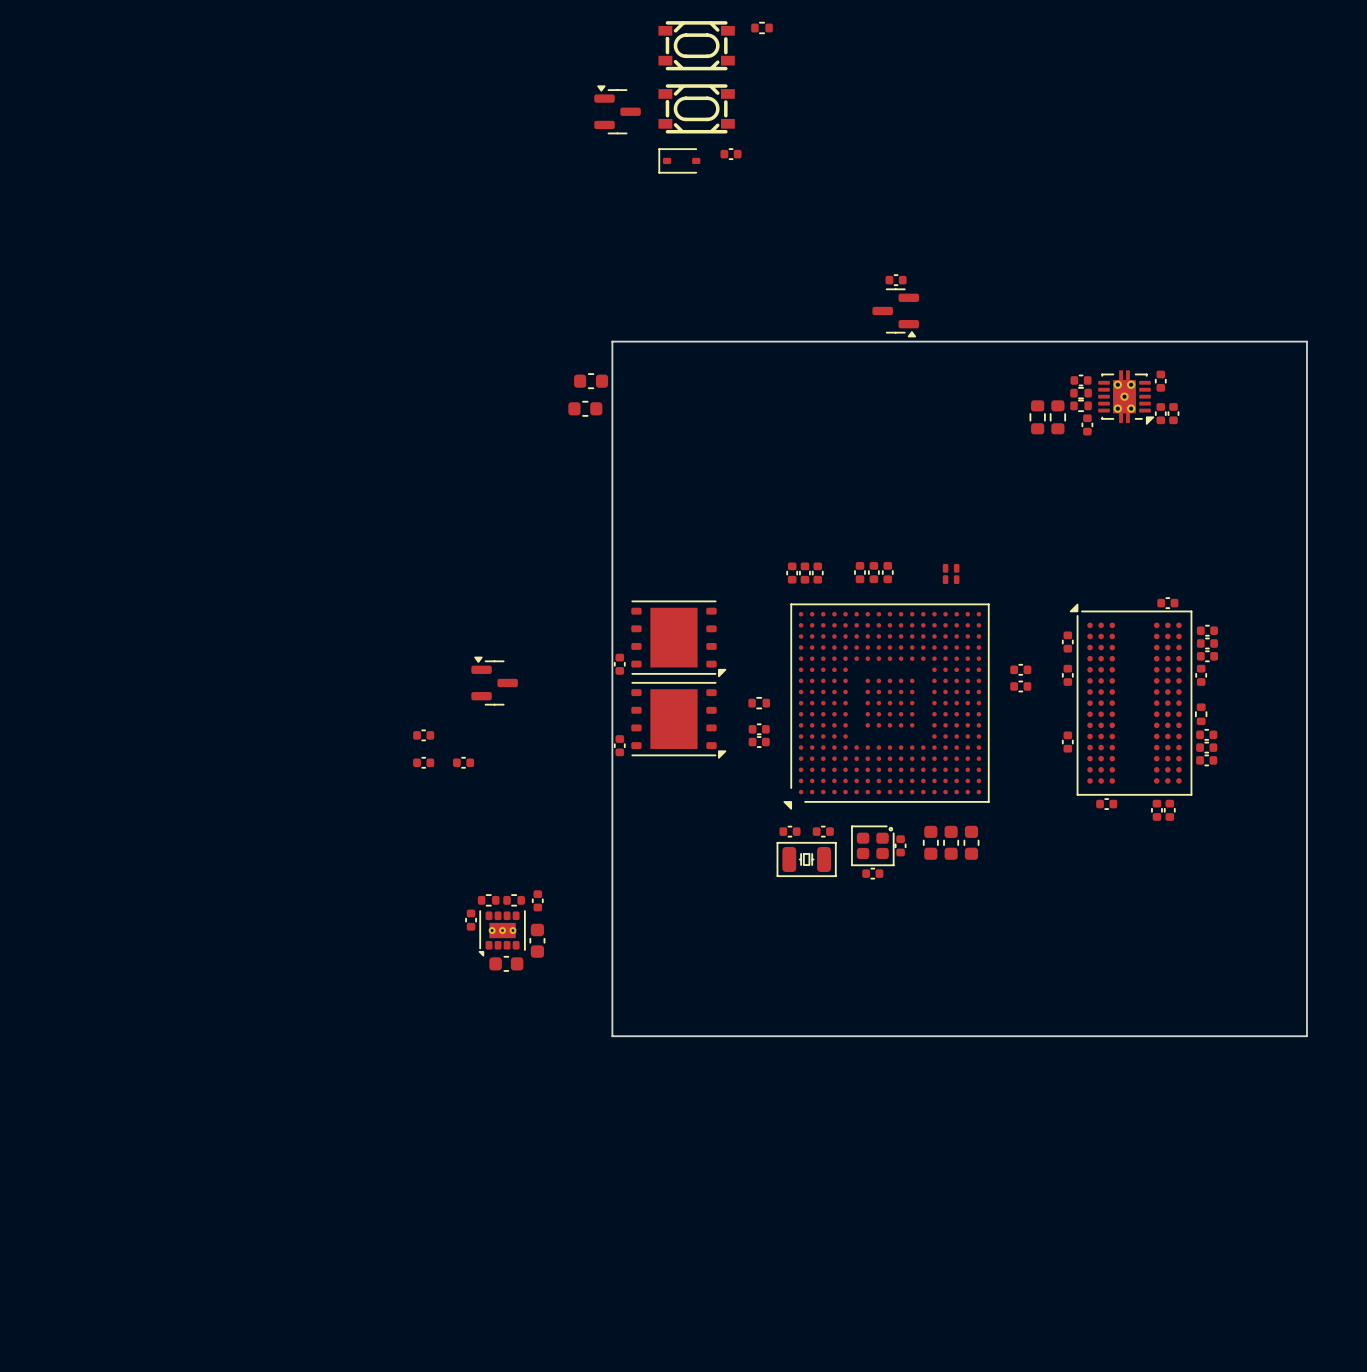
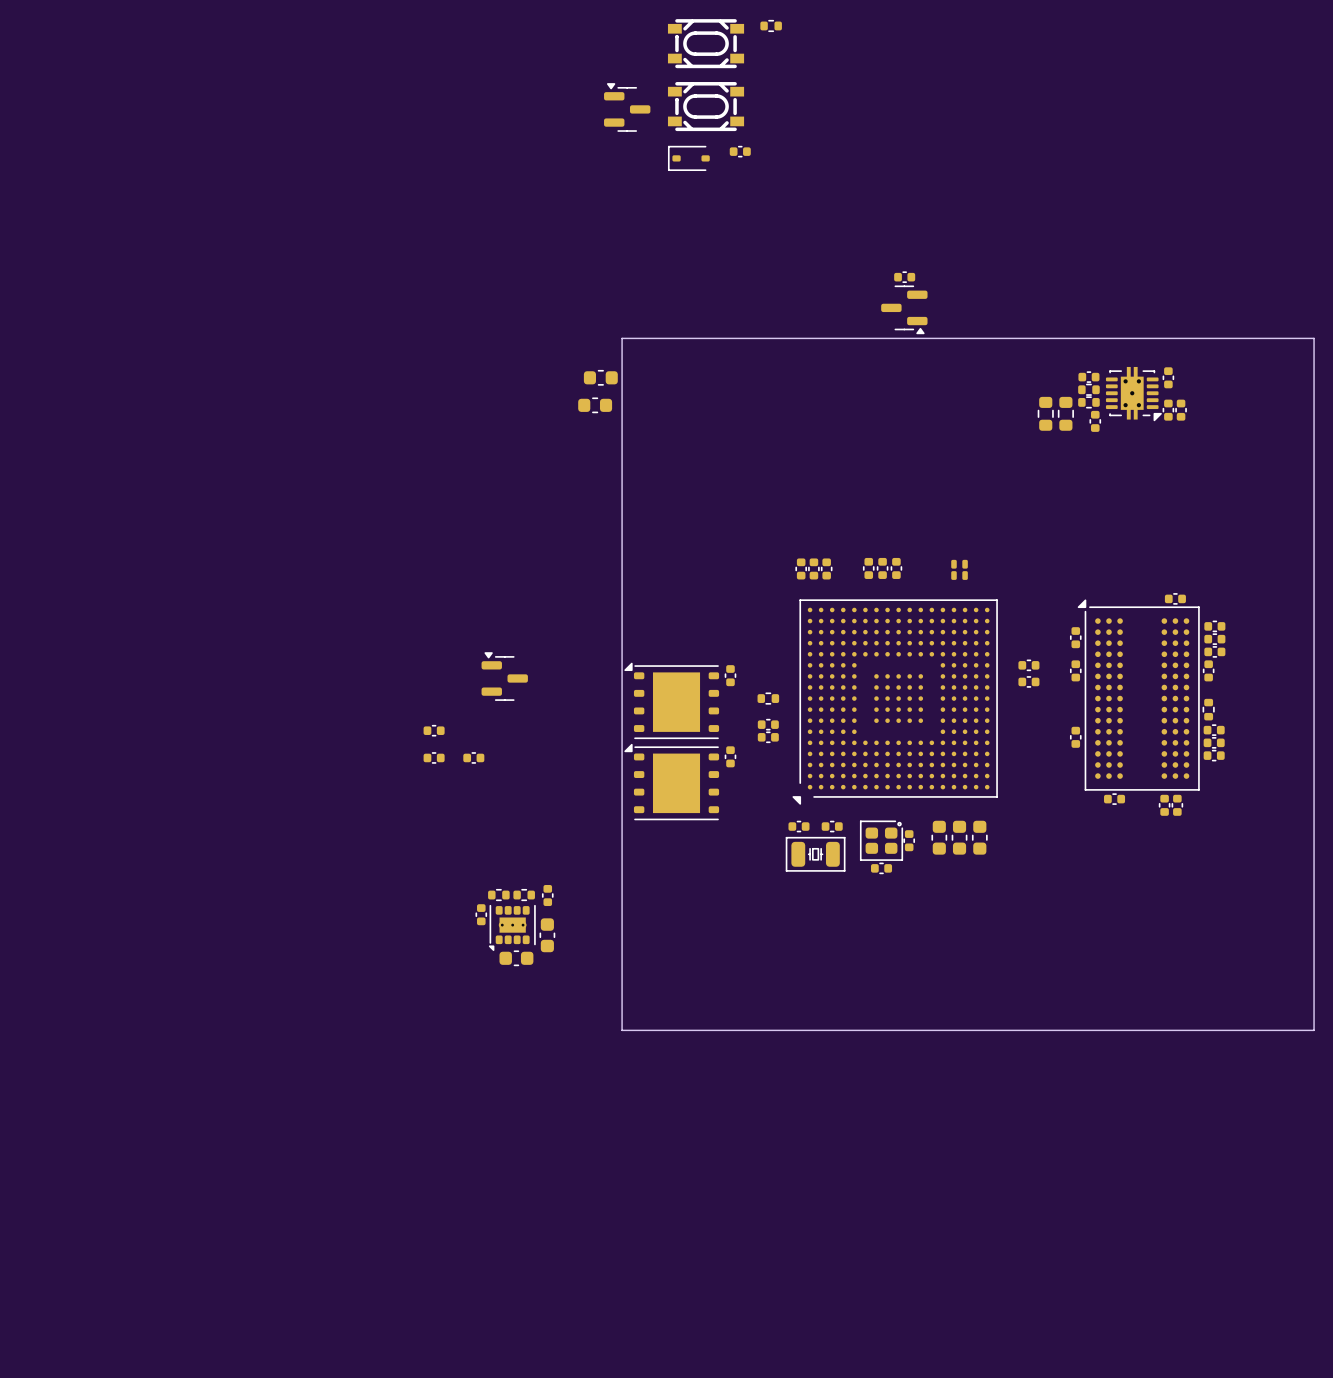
part: (678, 638) -> none
part: (619, 664) -> none
part: none -> (730, 675)
part rotation: 0° (678, 720) -> 180° (671, 700)
part: (619, 745) -> none
part: none -> (730, 756)
part: none -> (671, 782)

